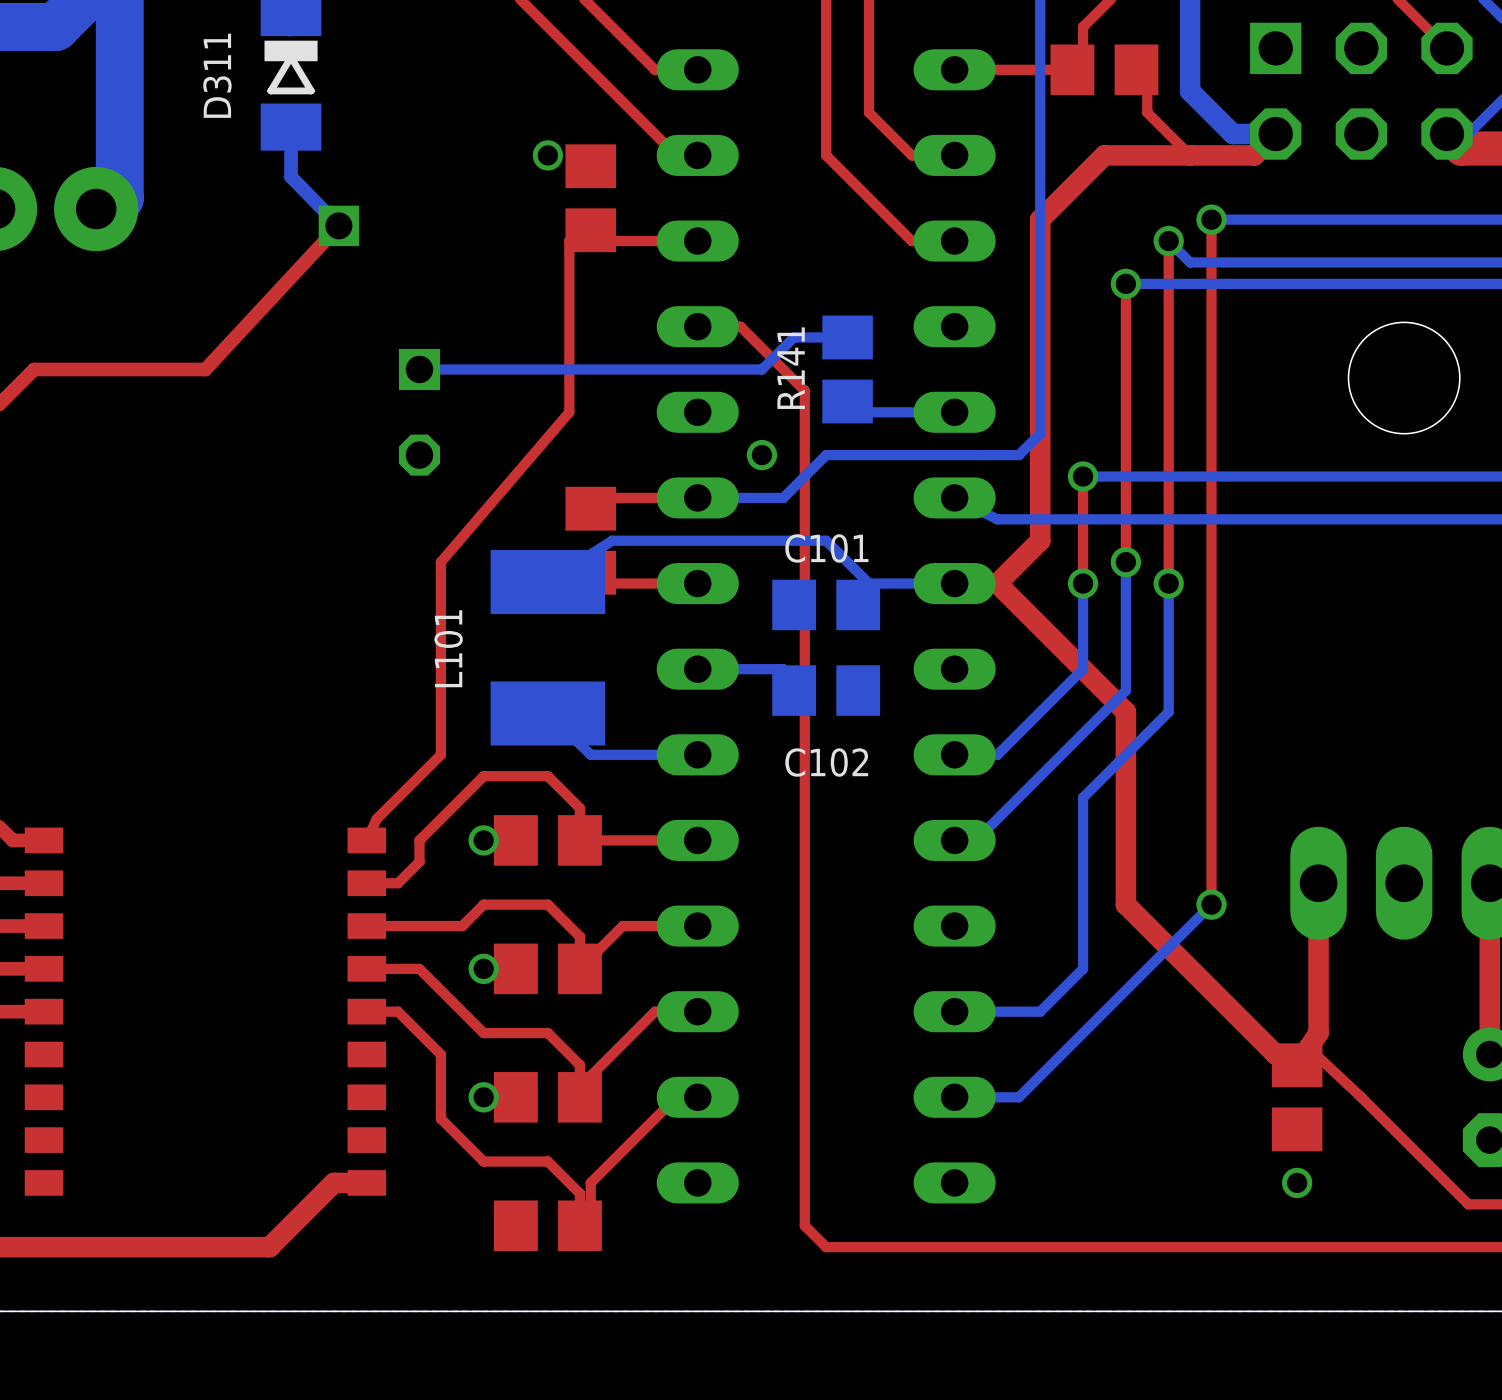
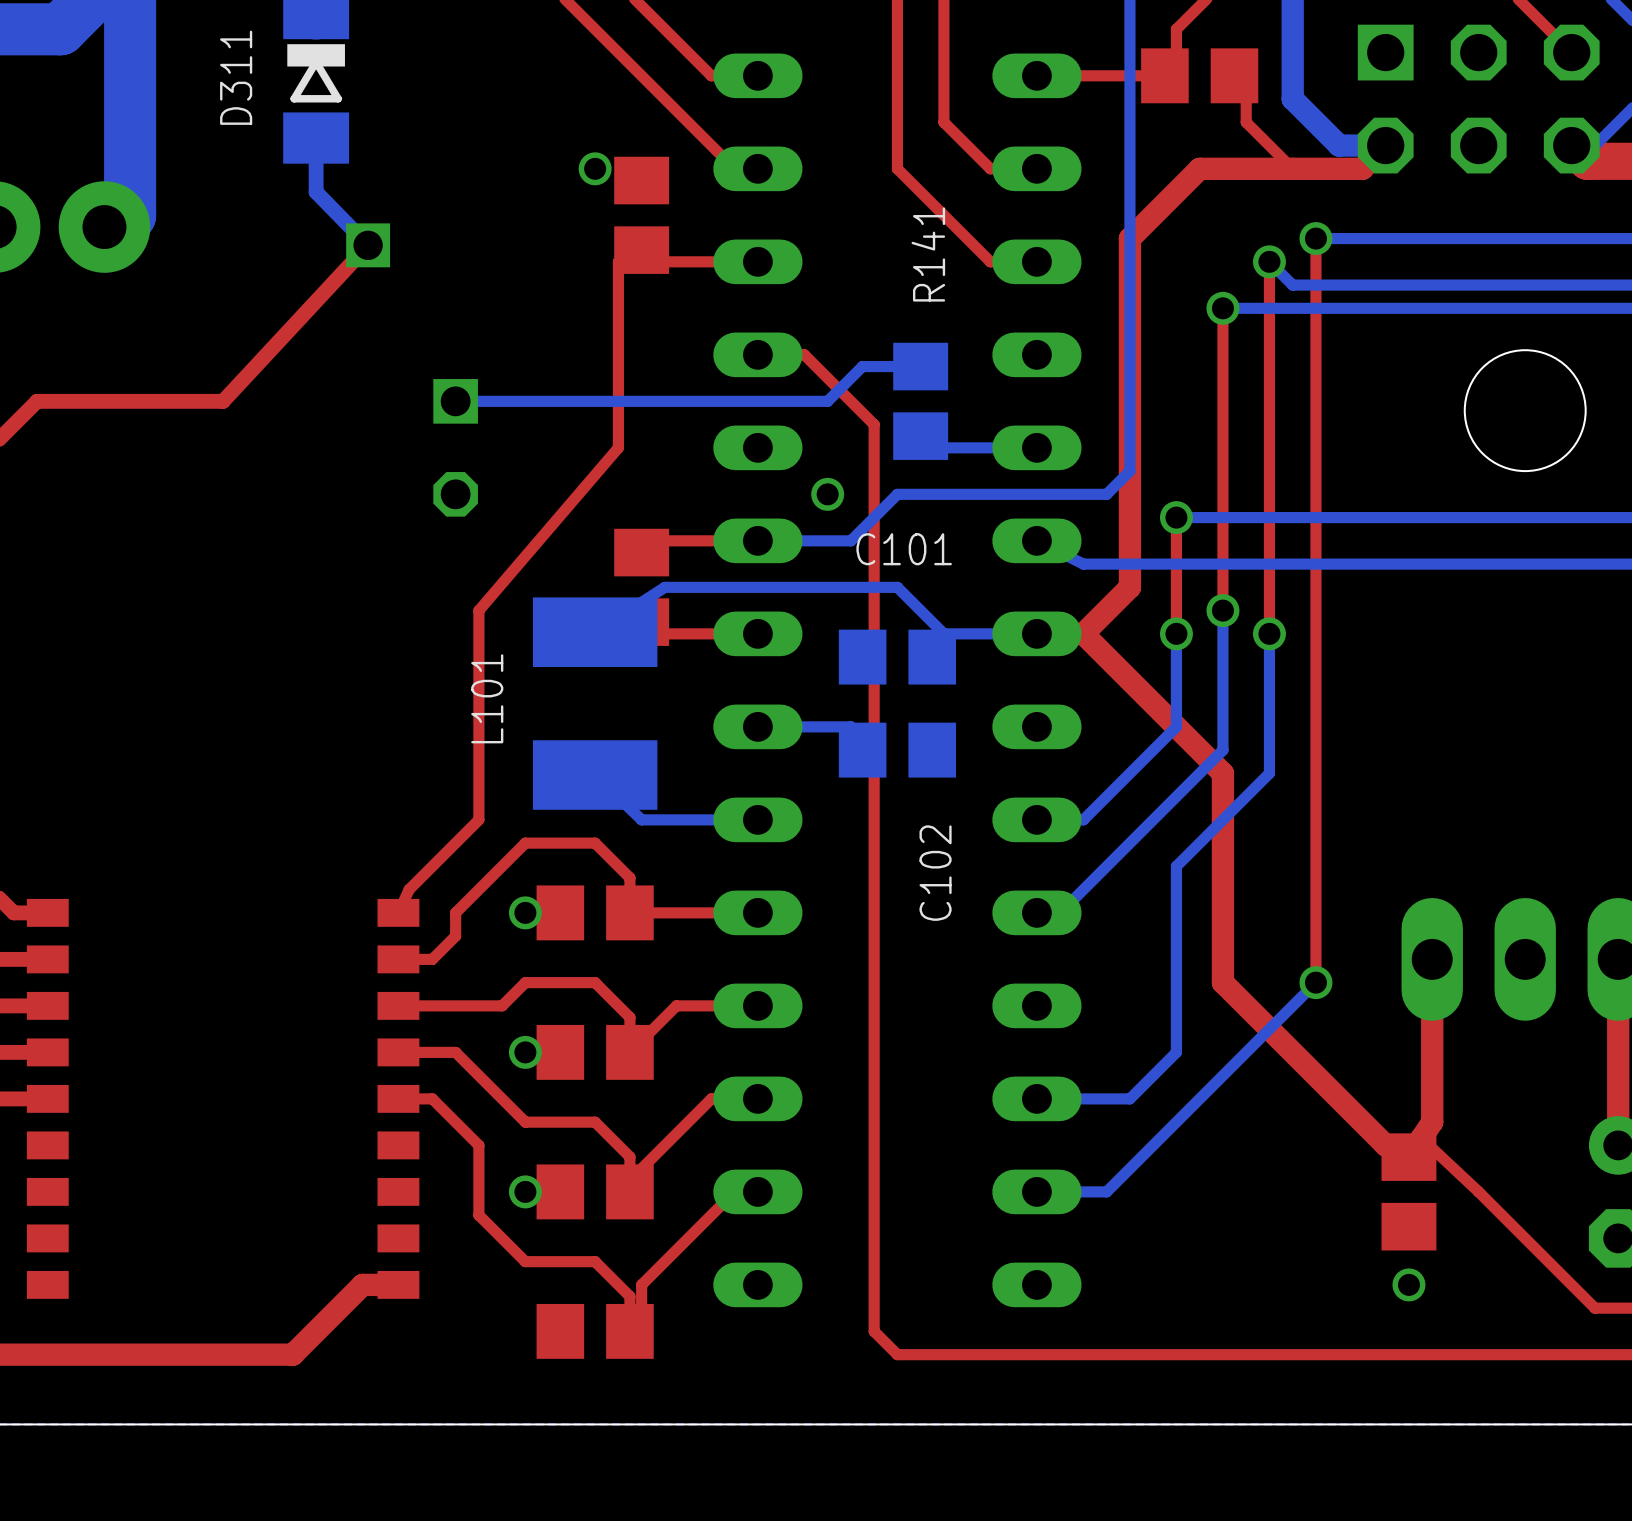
R141 name position: R141 (791, 368) -> R141 (928, 254)
C101 name position: C101 (826, 548) -> C101 (904, 549)
C102 name rotation: 0° (826, 762) -> 90° counterclockwise (935, 873)

